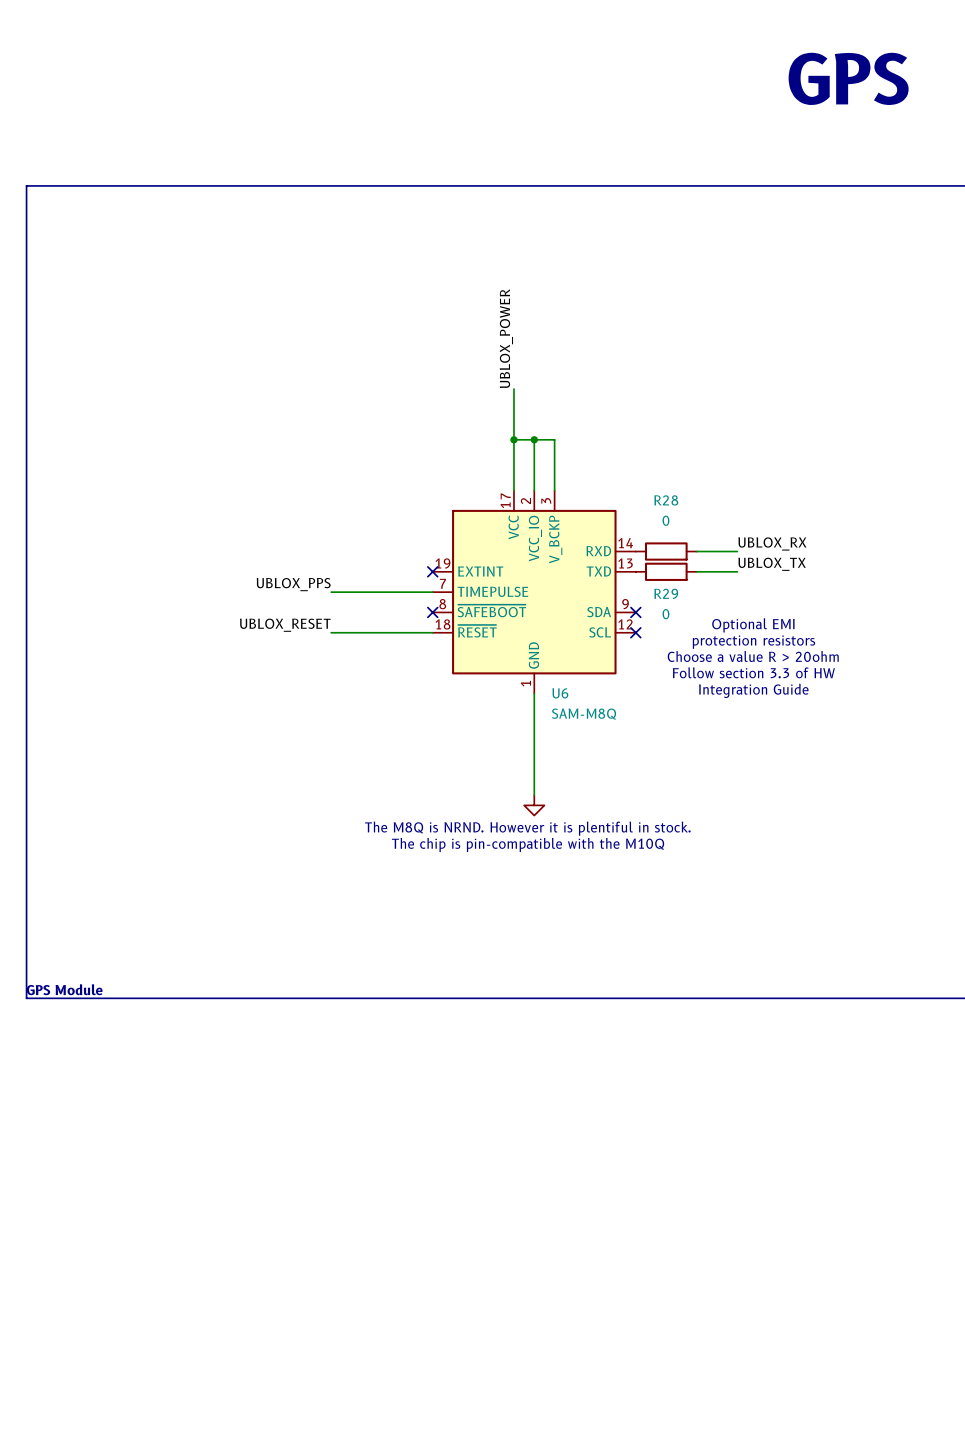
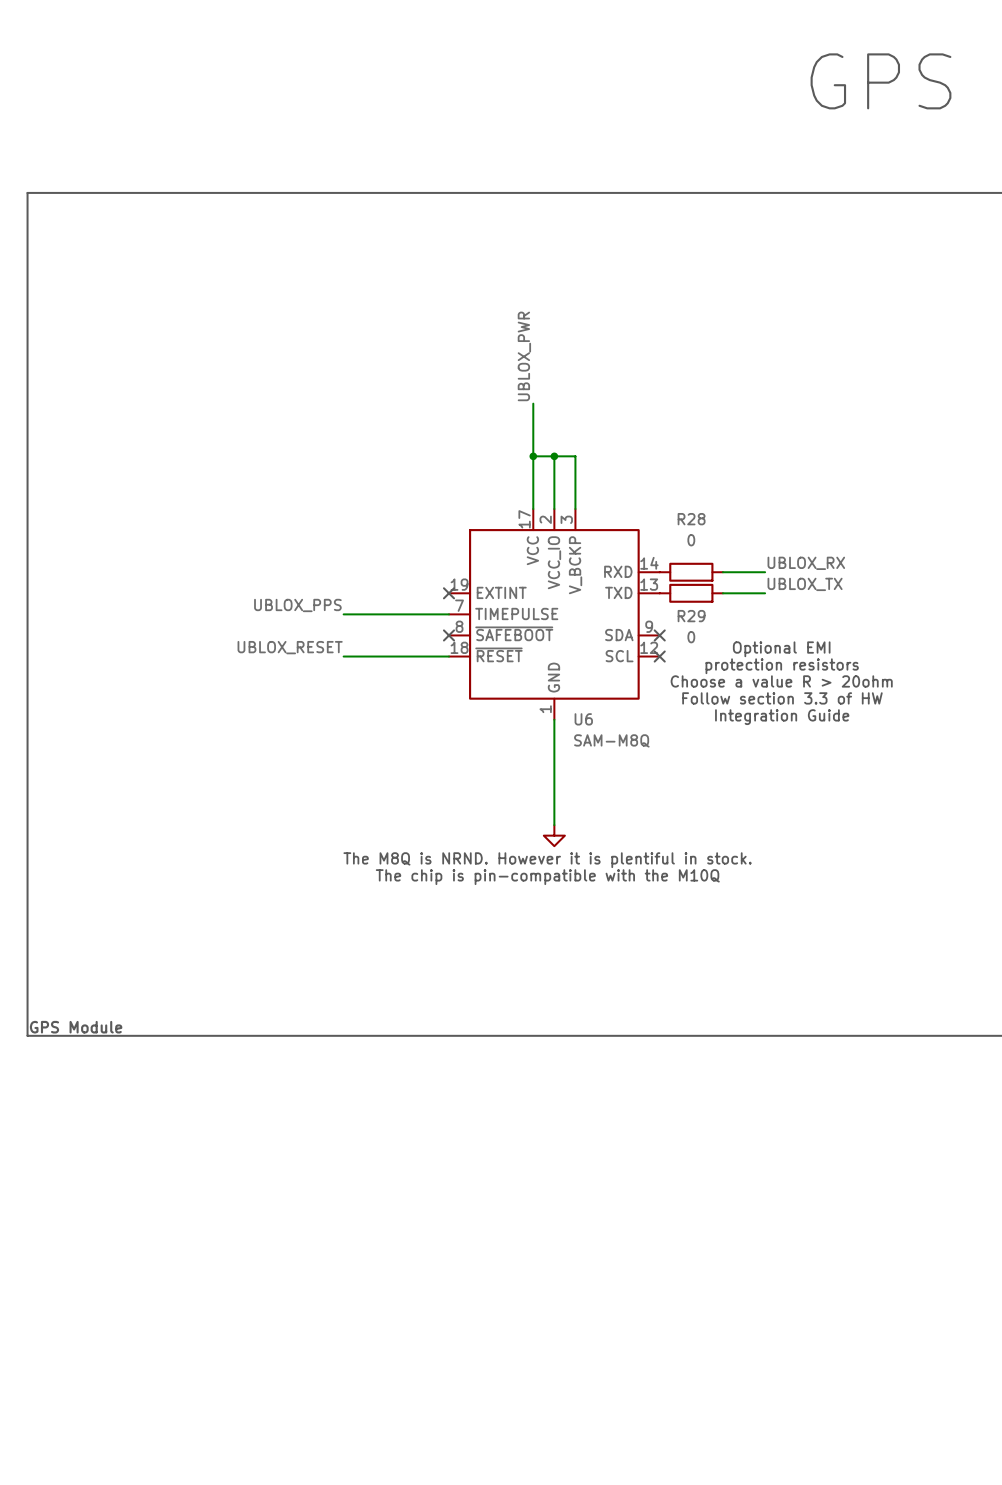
label: UBLOX_POWER (506, 338) -> UBLOX_PWR (524, 356)

